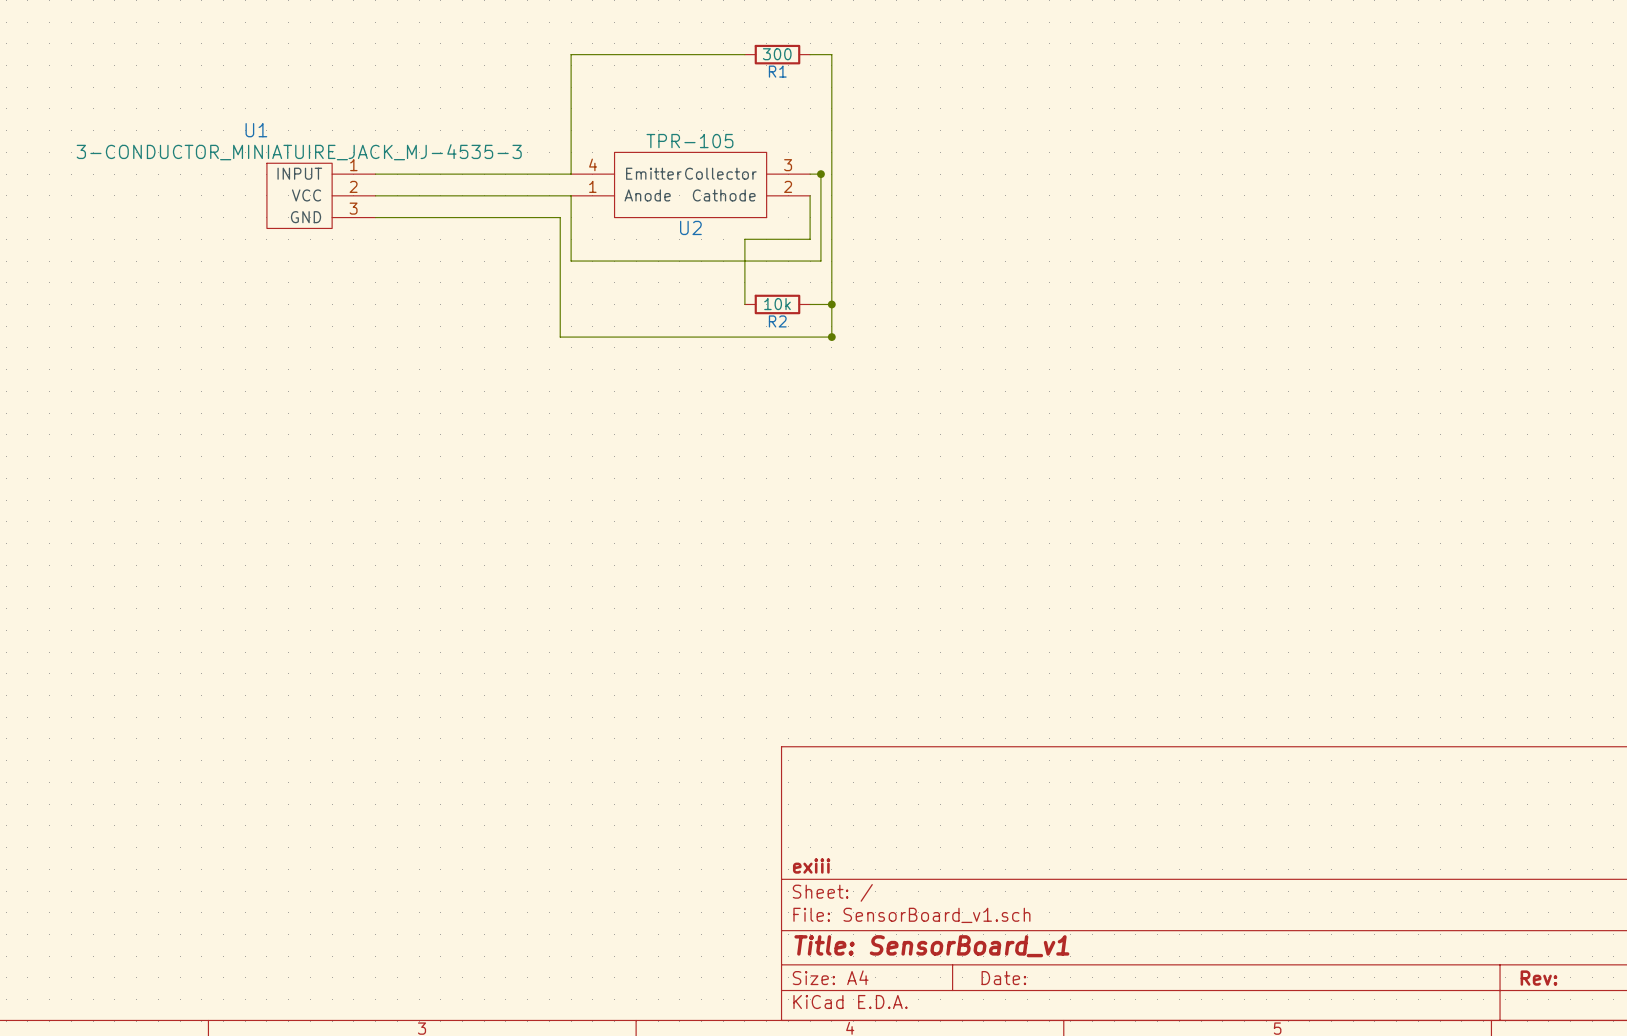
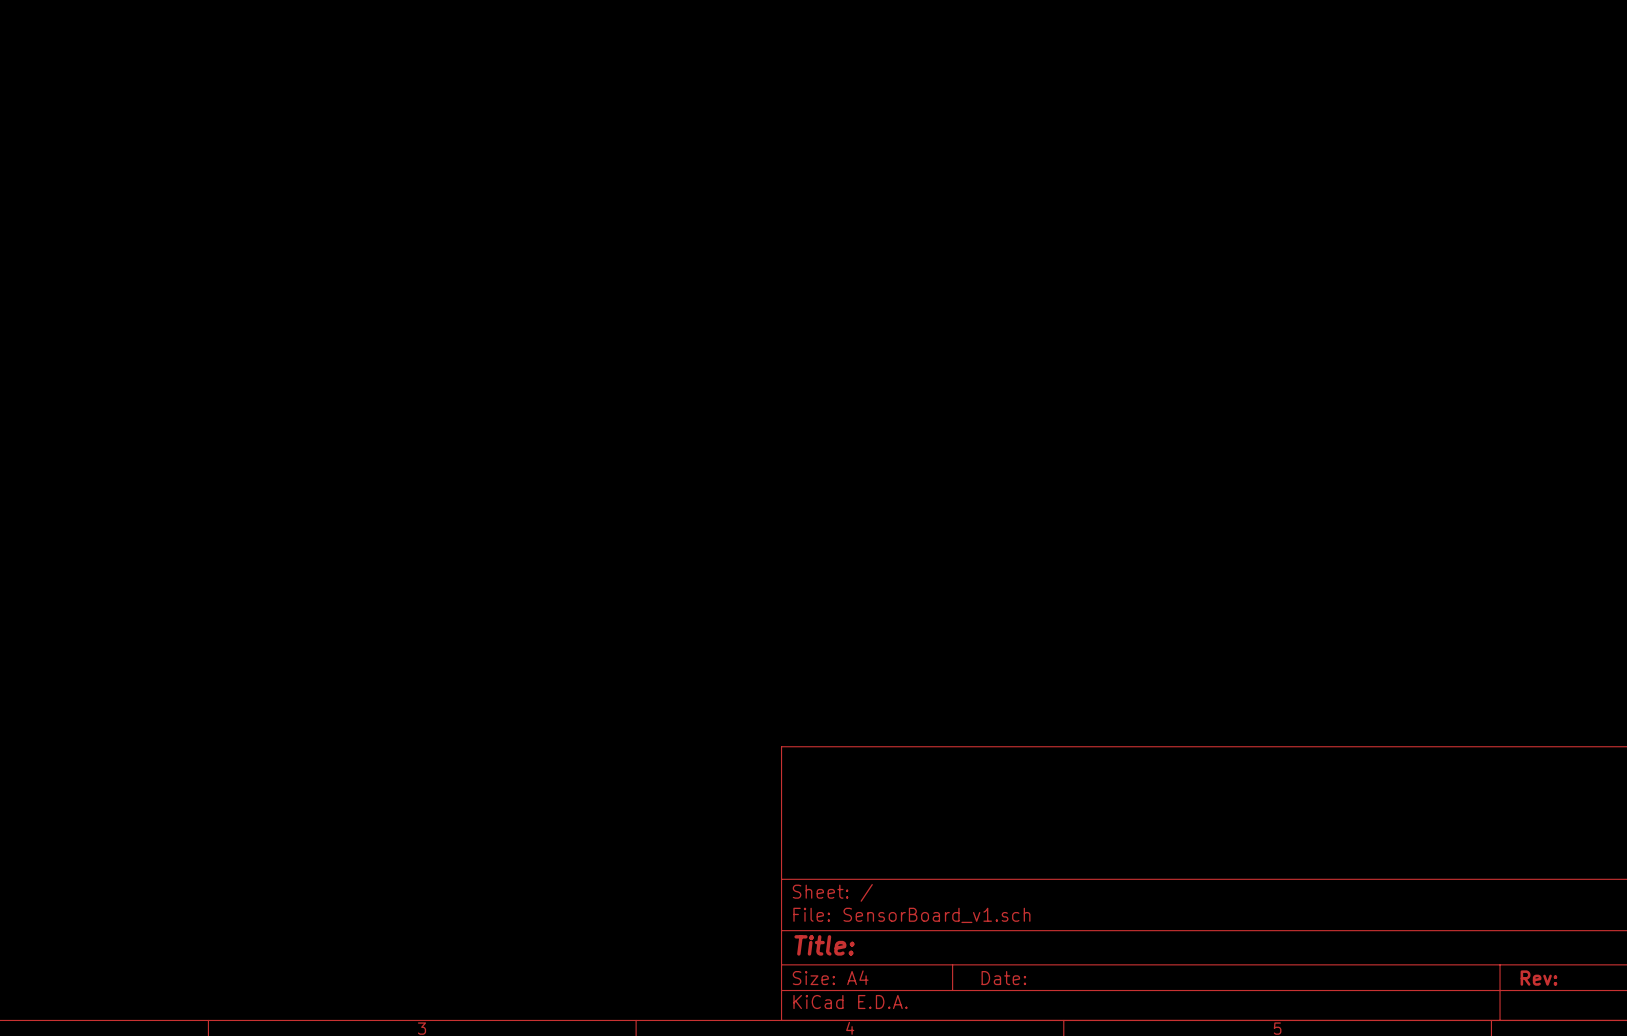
wire: (744, 54) (571, 54) (571, 174) (375, 174) -> none
R1: 300 (777, 54) -> none
wire: (810, 54) (831, 54) (831, 337) (560, 337) (560, 217) (375, 217) -> none
wire: (810, 174) (820, 174) (820, 261) (571, 261) (571, 195) (375, 195) -> none
junction: (820, 174) -> none
U2: TPR-105 (690, 184) -> none
U1: 3-CONDUCTOR_MINIATUIRE_JACK_MJ-4535-3 (321, 195) -> none
wire: (810, 195) (810, 239) (744, 239) (744, 304) -> none
R2: 10k (777, 304) -> none
wire: (810, 304) (831, 304) -> none
junction: (831, 304) -> none
junction: (831, 337) -> none
title block: exiii (811, 866) -> none
title block: Title: SensorBoard_v1 (931, 946) -> Title: (824, 945)

